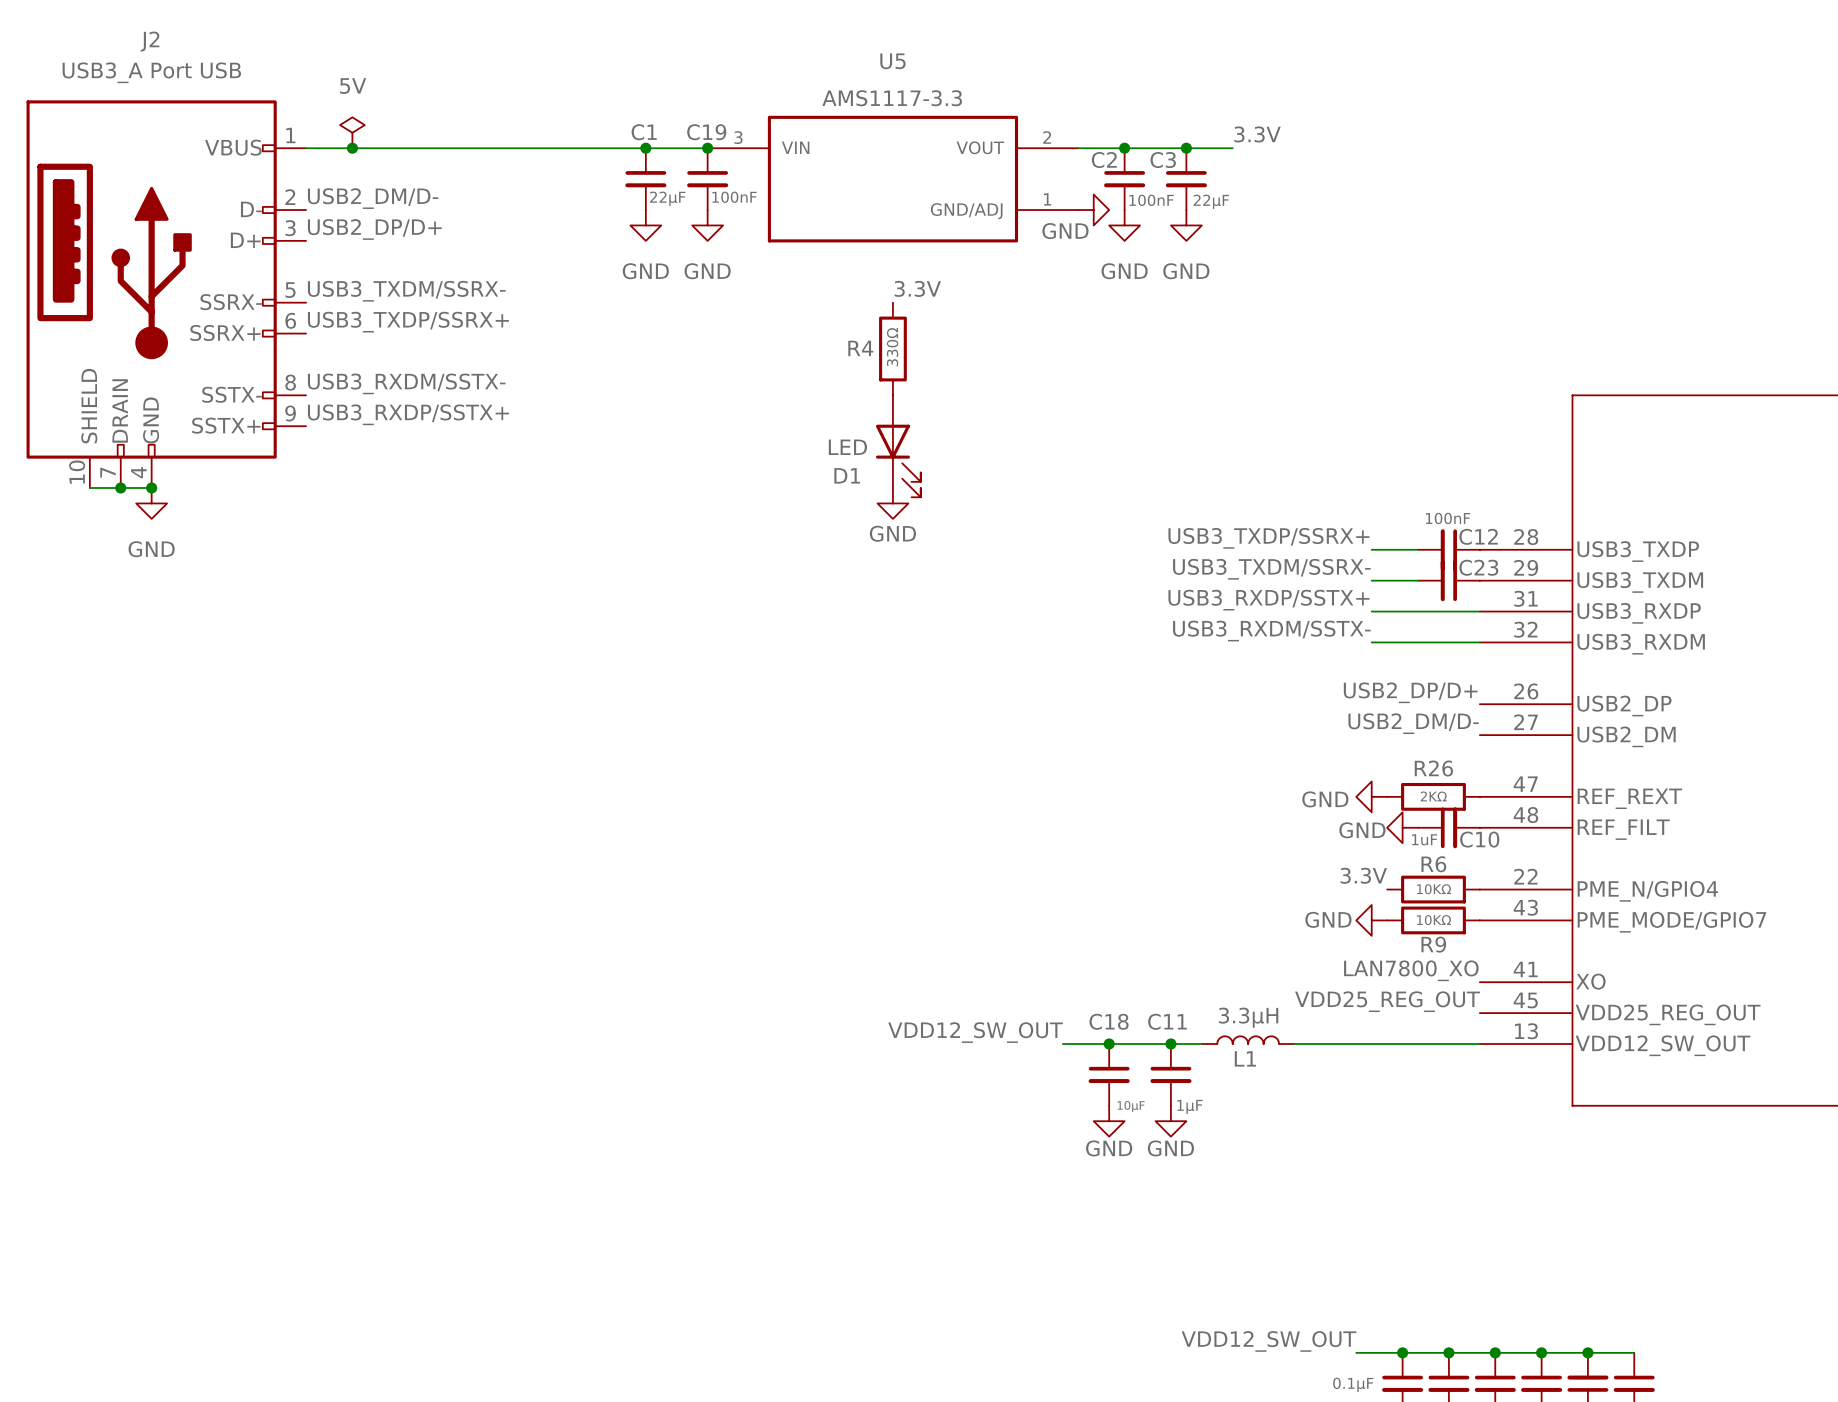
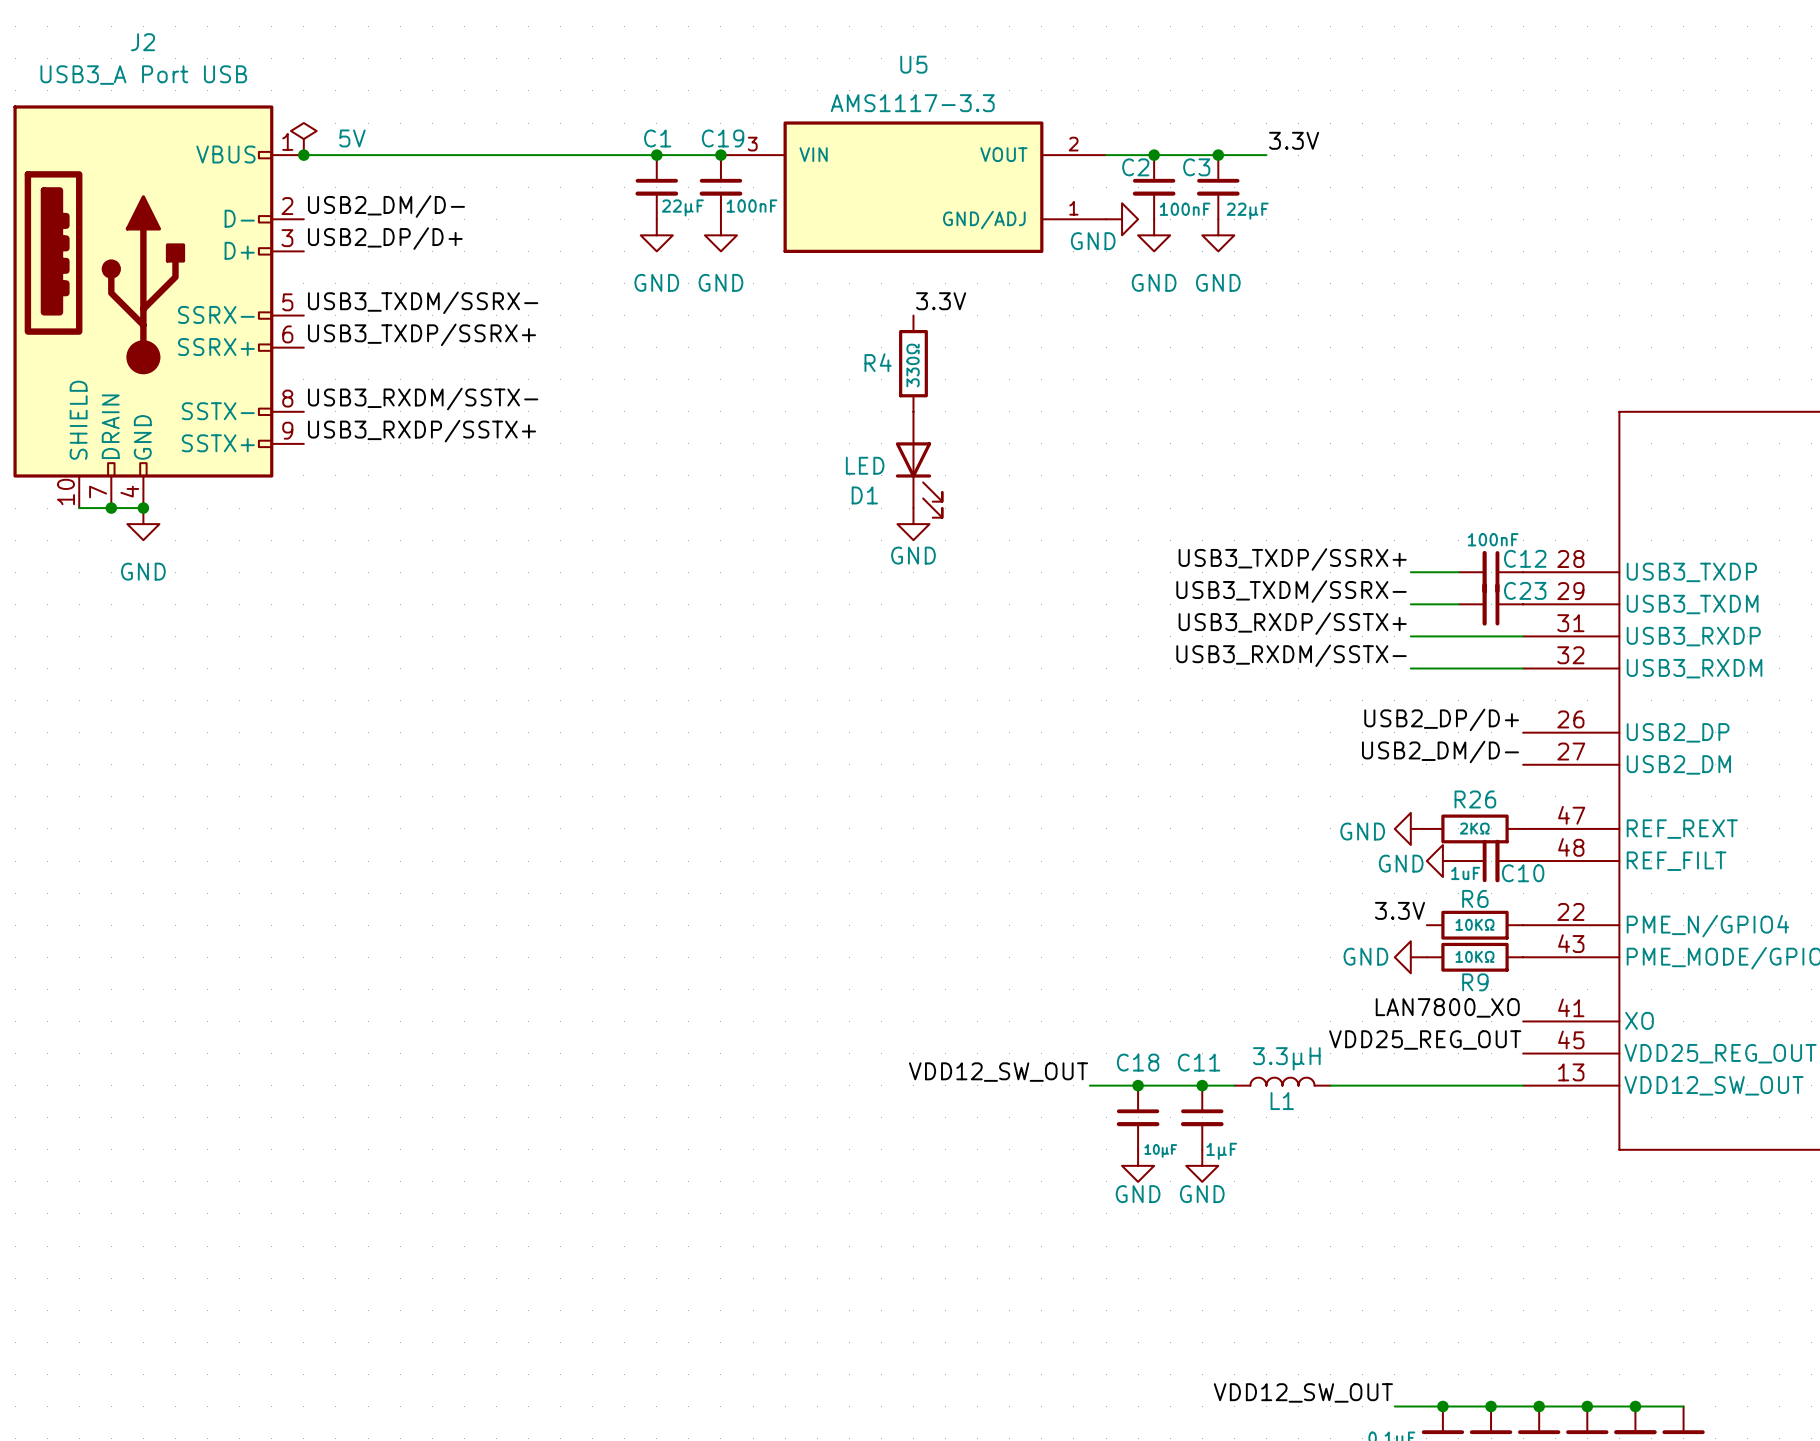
power symbol text position: 5V (353, 86) -> 5V (352, 138)
power symbol position: 5V (352, 132) -> 5V (303, 139)
junction position: (352, 148) -> (303, 155)

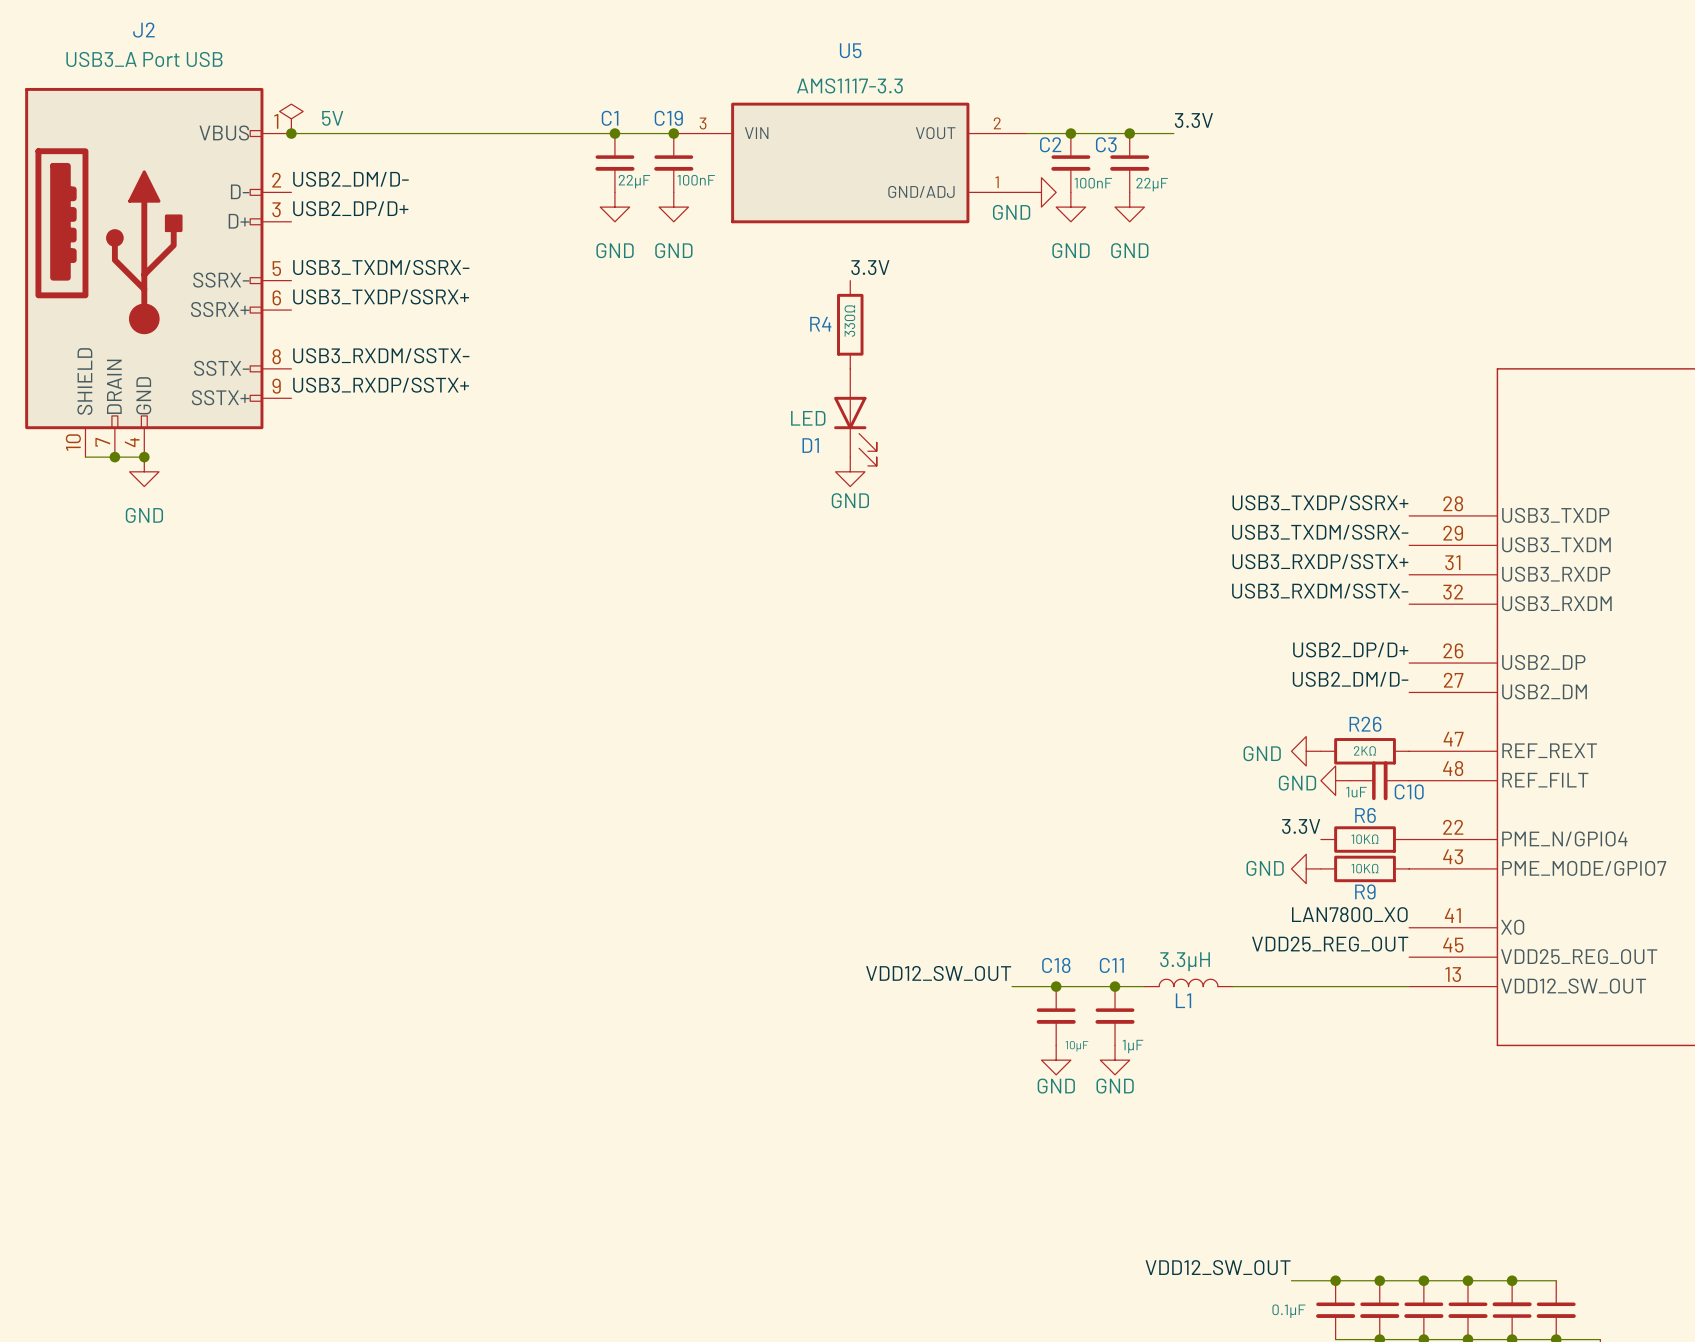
label position: USB3_TXDP/SSRX+ (1292, 559) -> USB3_TXDP/SSRX+ (1320, 502)
wire: (1410, 572) (1458, 572) -> none
C12: 100nF (1491, 572) -> none
label position: USB3_TXDM/SSRX- (1291, 591) -> USB3_TXDM/SSRX- (1320, 532)
wire: (1410, 604) (1458, 604) -> none
C23: (1491, 604) -> none
label position: USB3_RXDP/SSTX+ (1292, 623) -> USB3_RXDP/SSTX+ (1320, 561)
wire: (1410, 636) (1523, 636) -> none
label position: USB3_RXDM/SSTX- (1291, 655) -> USB3_RXDM/SSTX- (1320, 591)
wire: (1410, 668) (1523, 668) -> none

